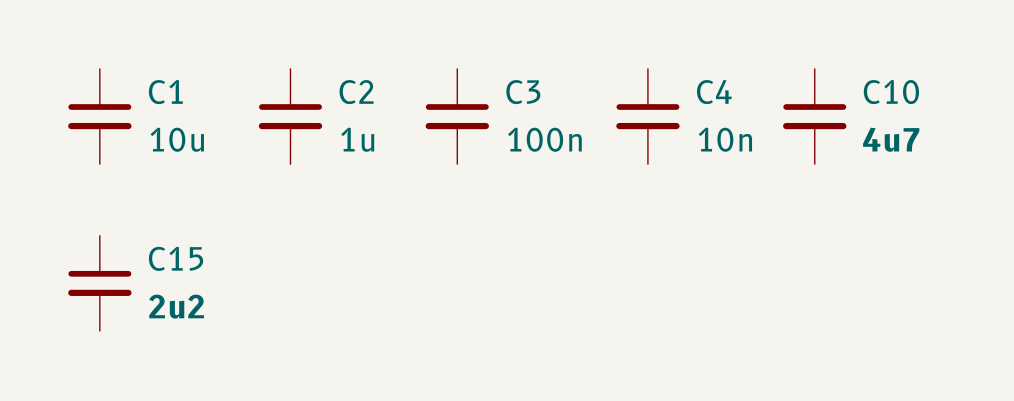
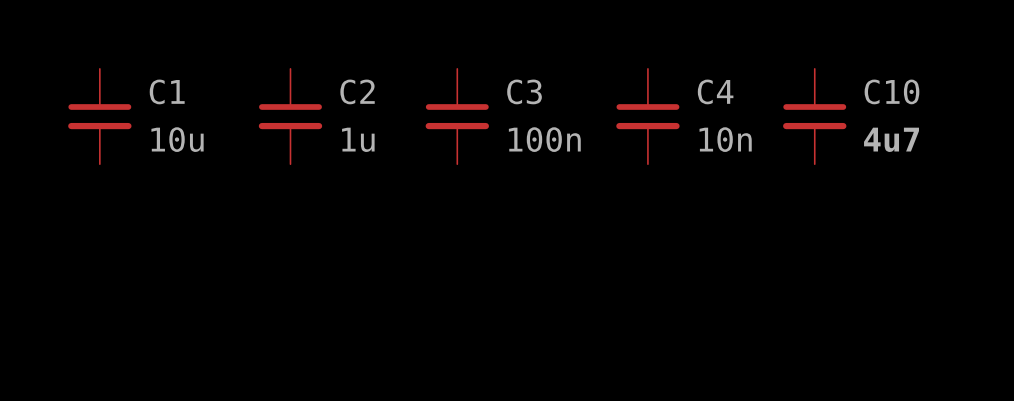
C15: 2u2 (99, 283) -> none

